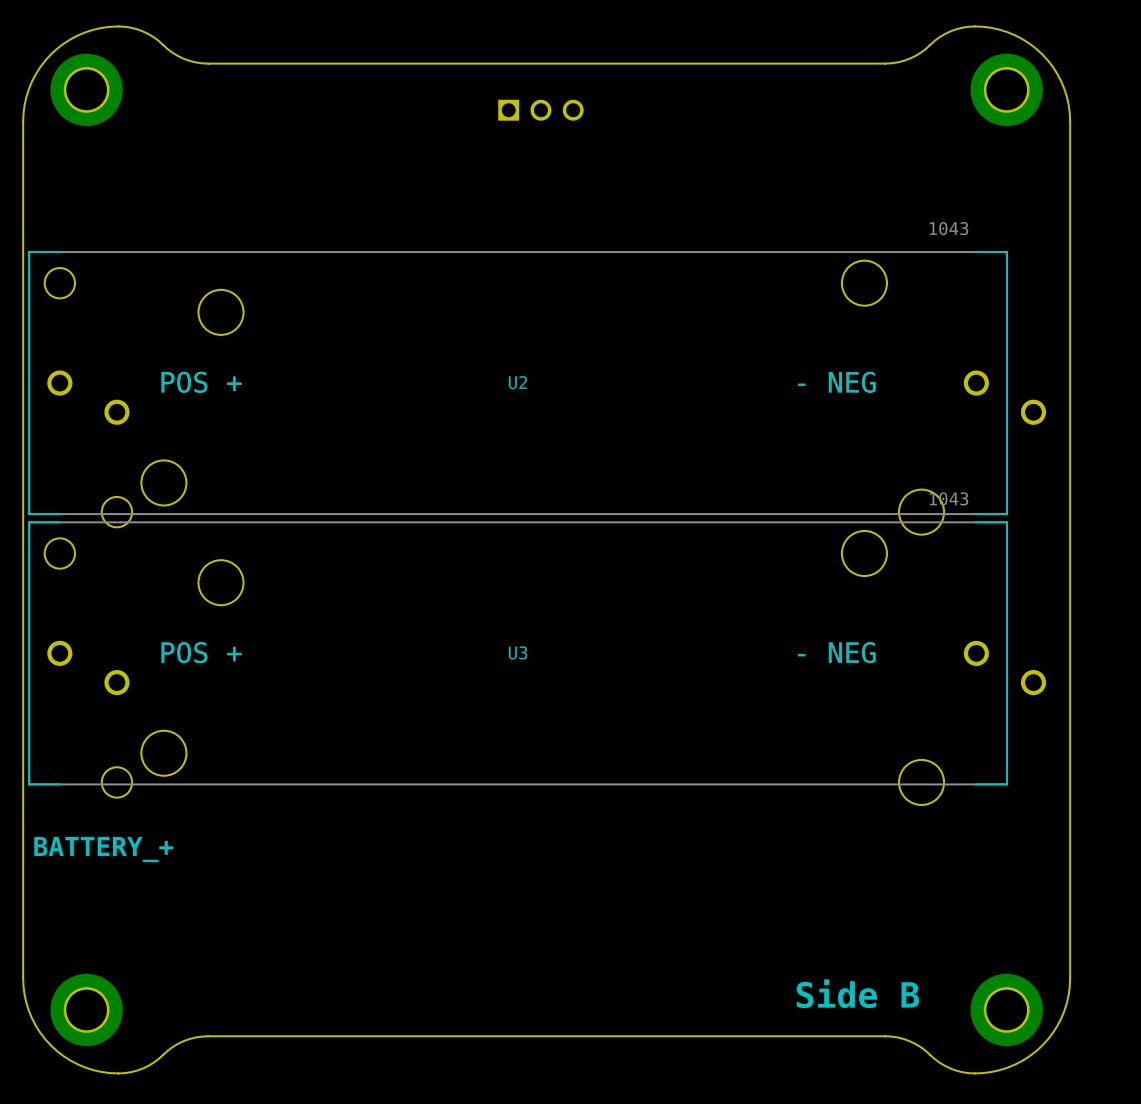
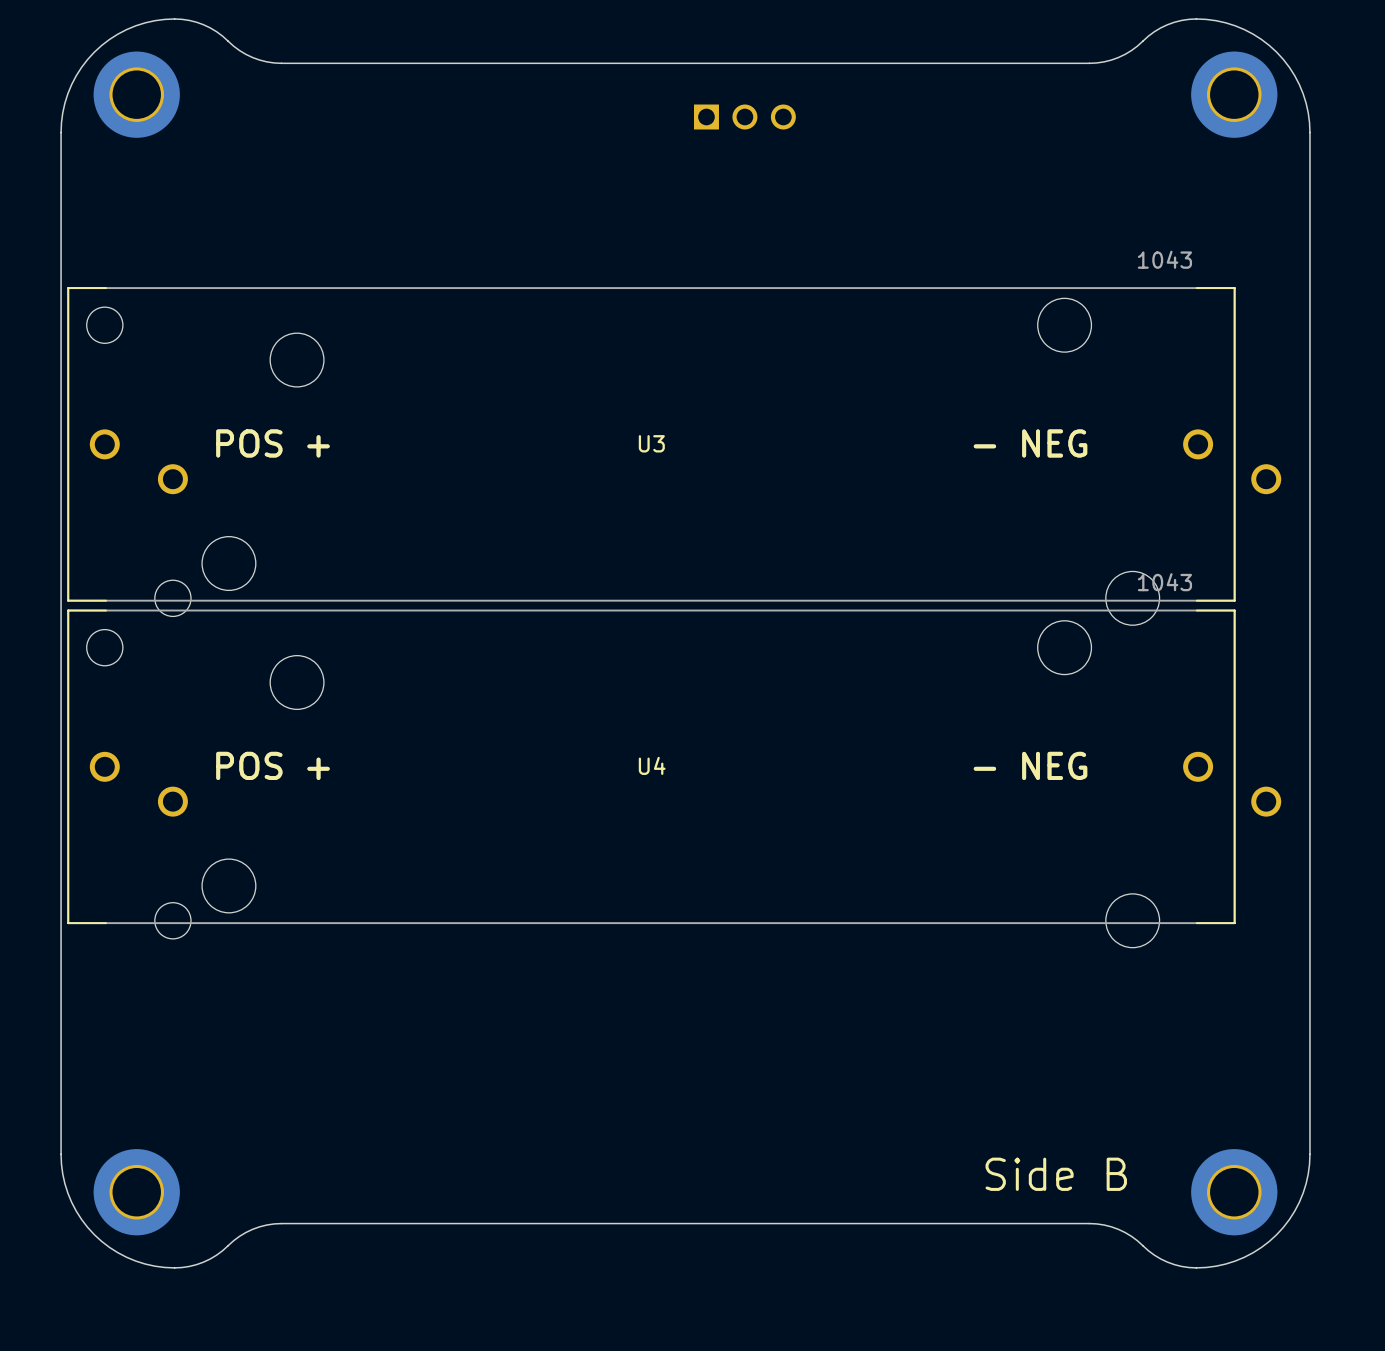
part position: (540, 110) -> (744, 117)
U2 name: U2 (517, 382) -> U3 (651, 443)
U3 name: U3 (518, 652) -> U4 (652, 765)
text: BATTERY_+ (103, 849) -> none

